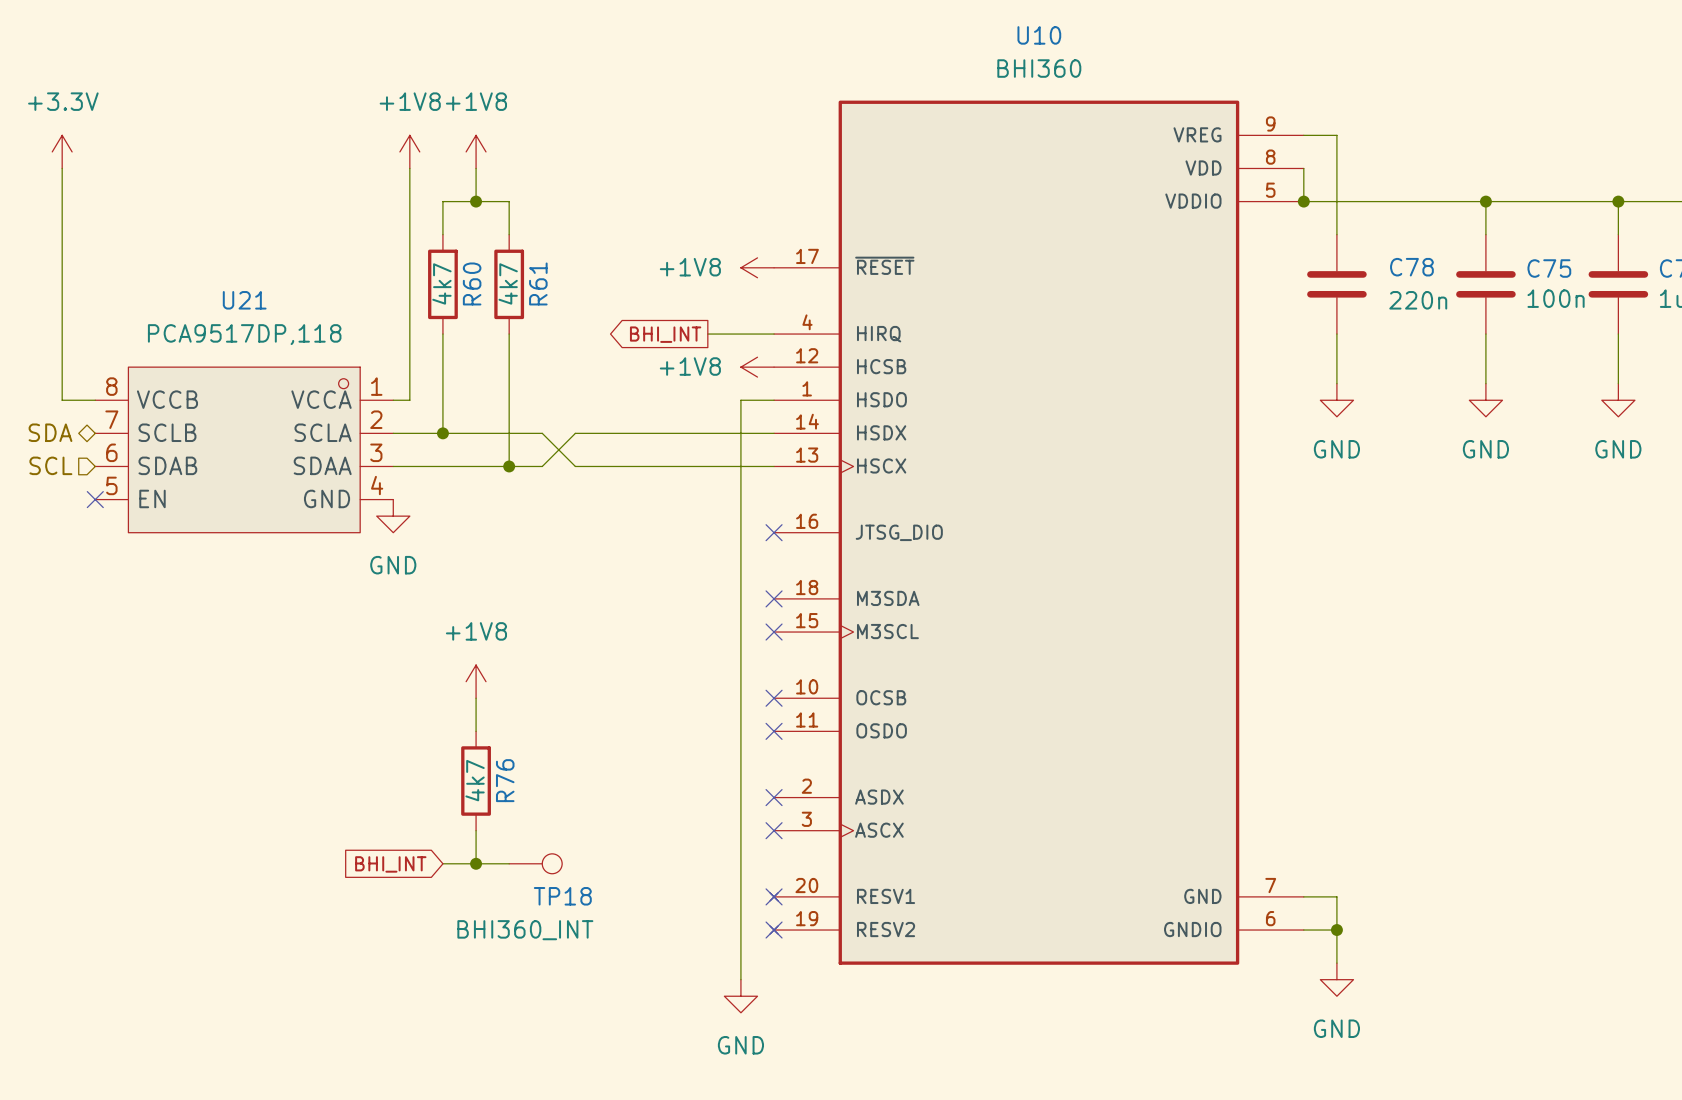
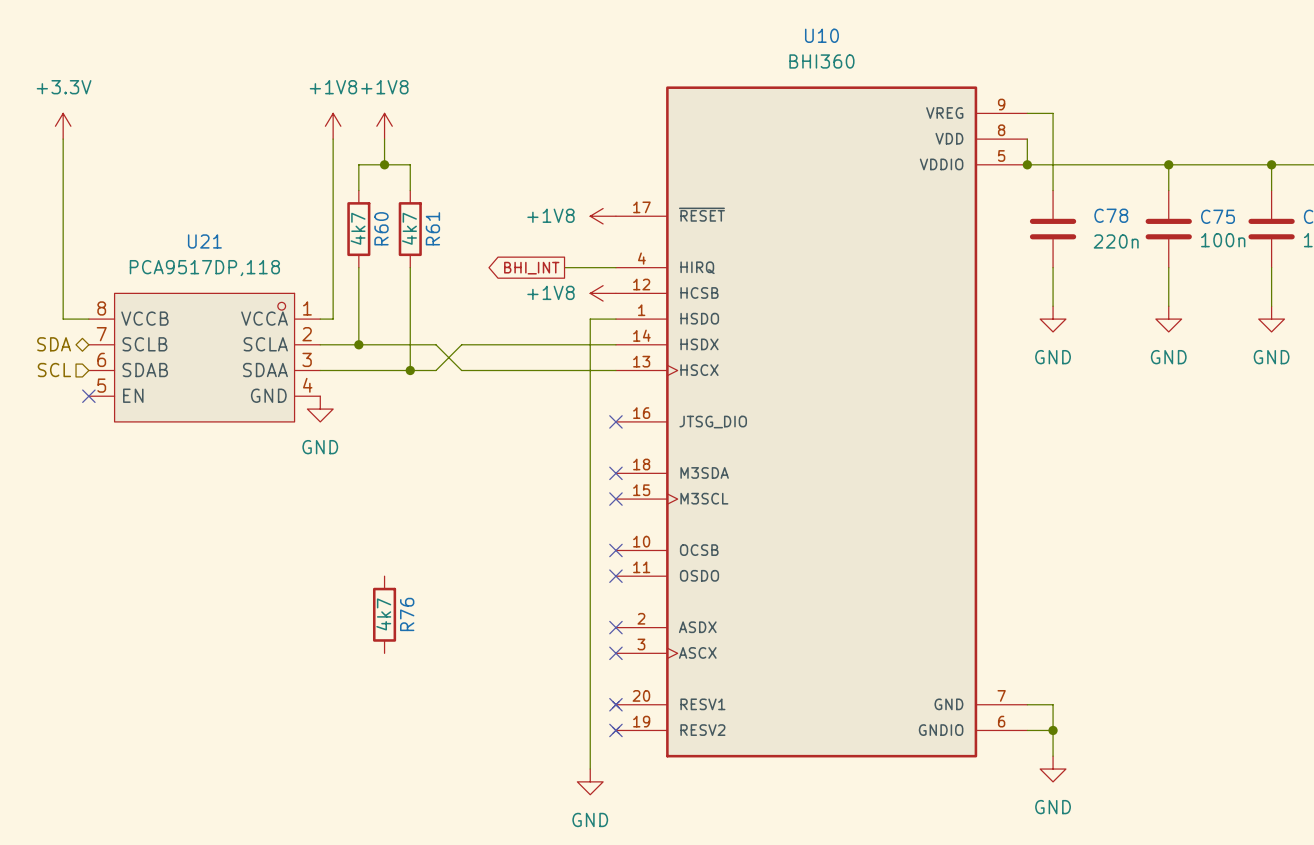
power symbol: +1V8 (476, 681) -> none
wire: (476, 698) (476, 731) -> none
wire: (476, 830) (476, 863) -> none
wire: (442, 863) (509, 863) -> none
junction: (476, 863) -> none
TP18: BHI360_INT (535, 863) -> none
global label: BHI_INT (390, 864) -> none

